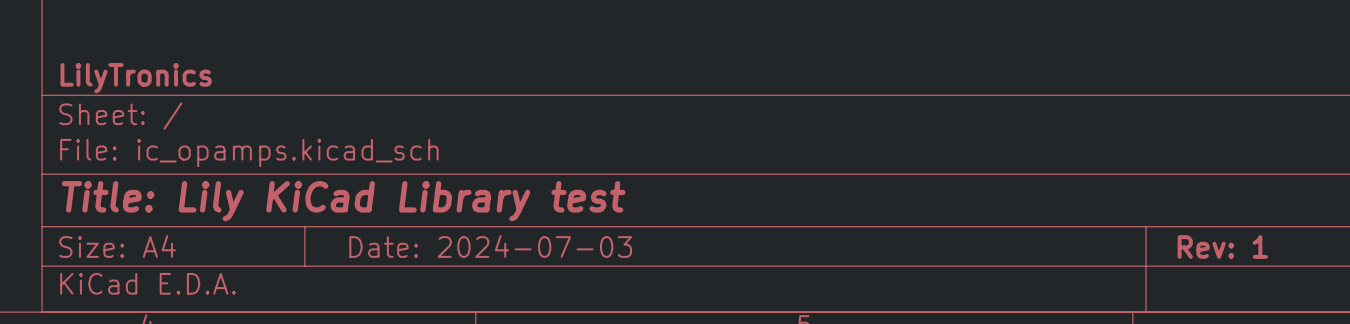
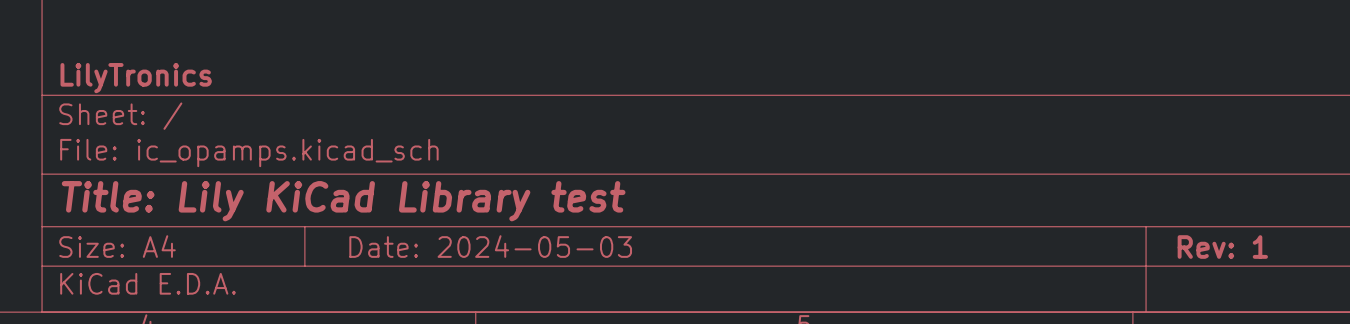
title block: Date: 2024-07-03 (490, 246) -> Date: 2024-05-03 (490, 246)

